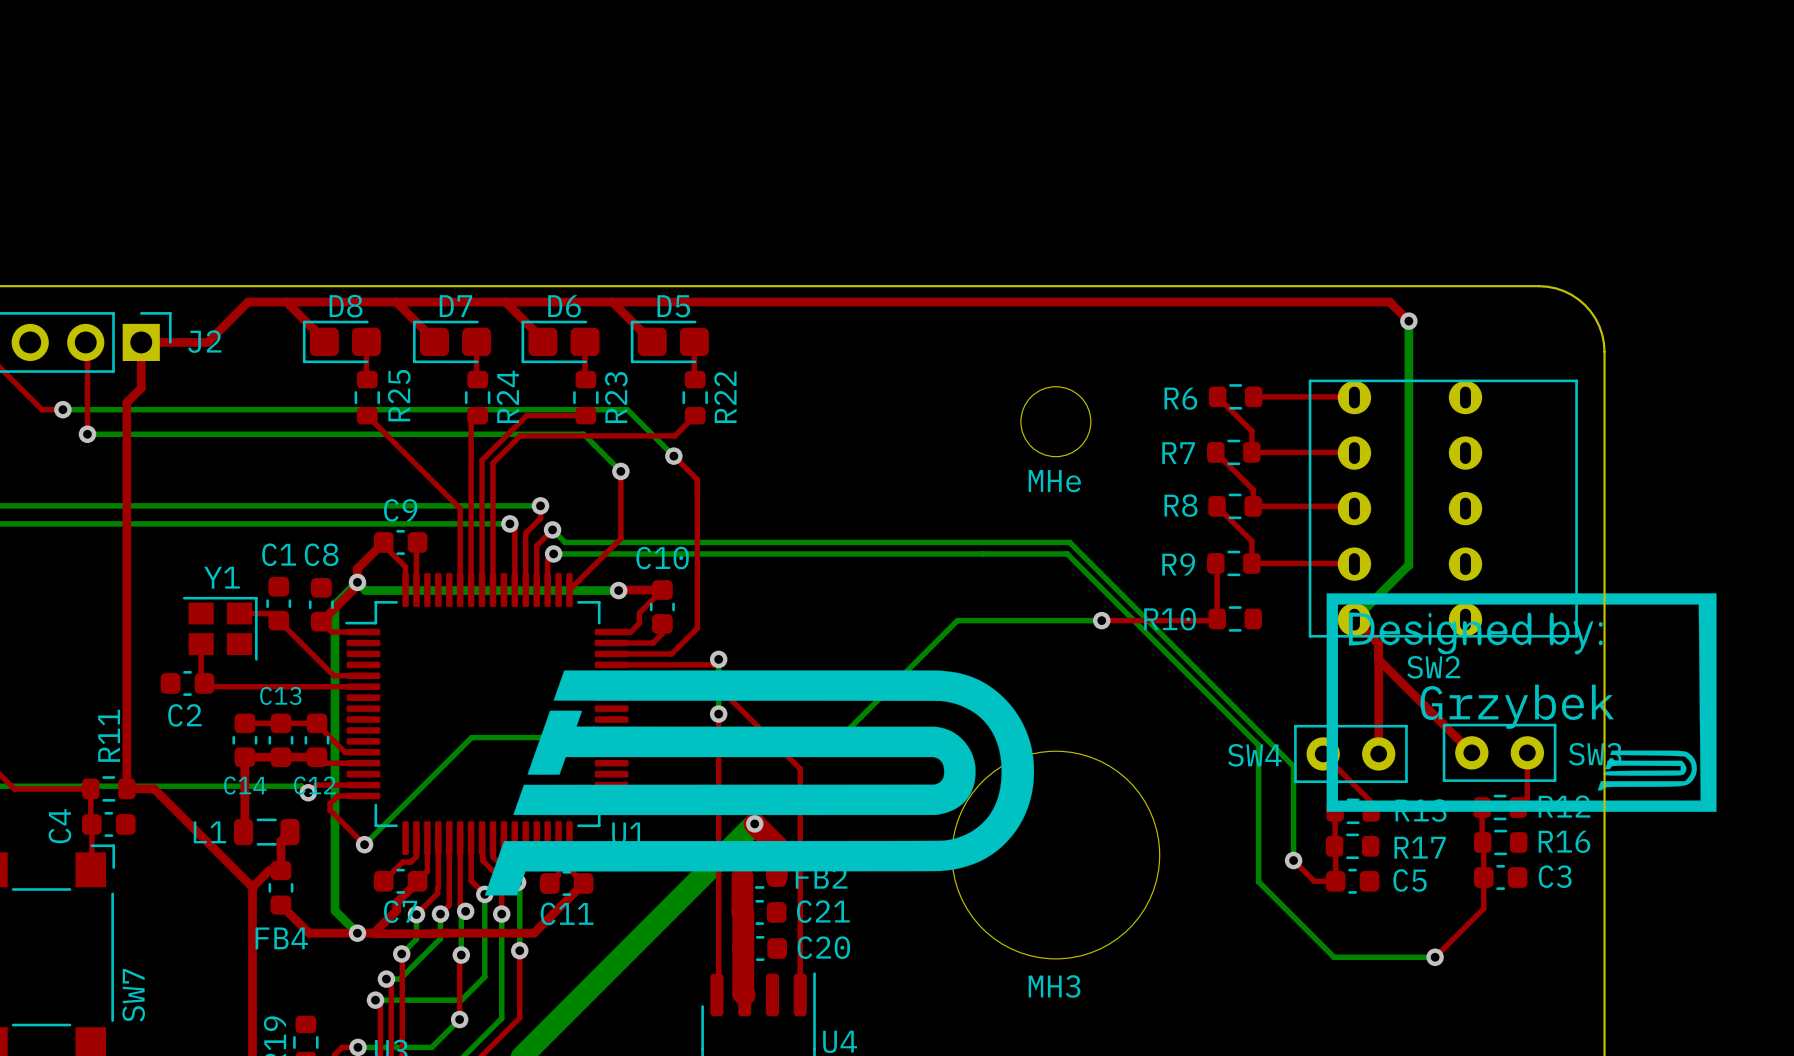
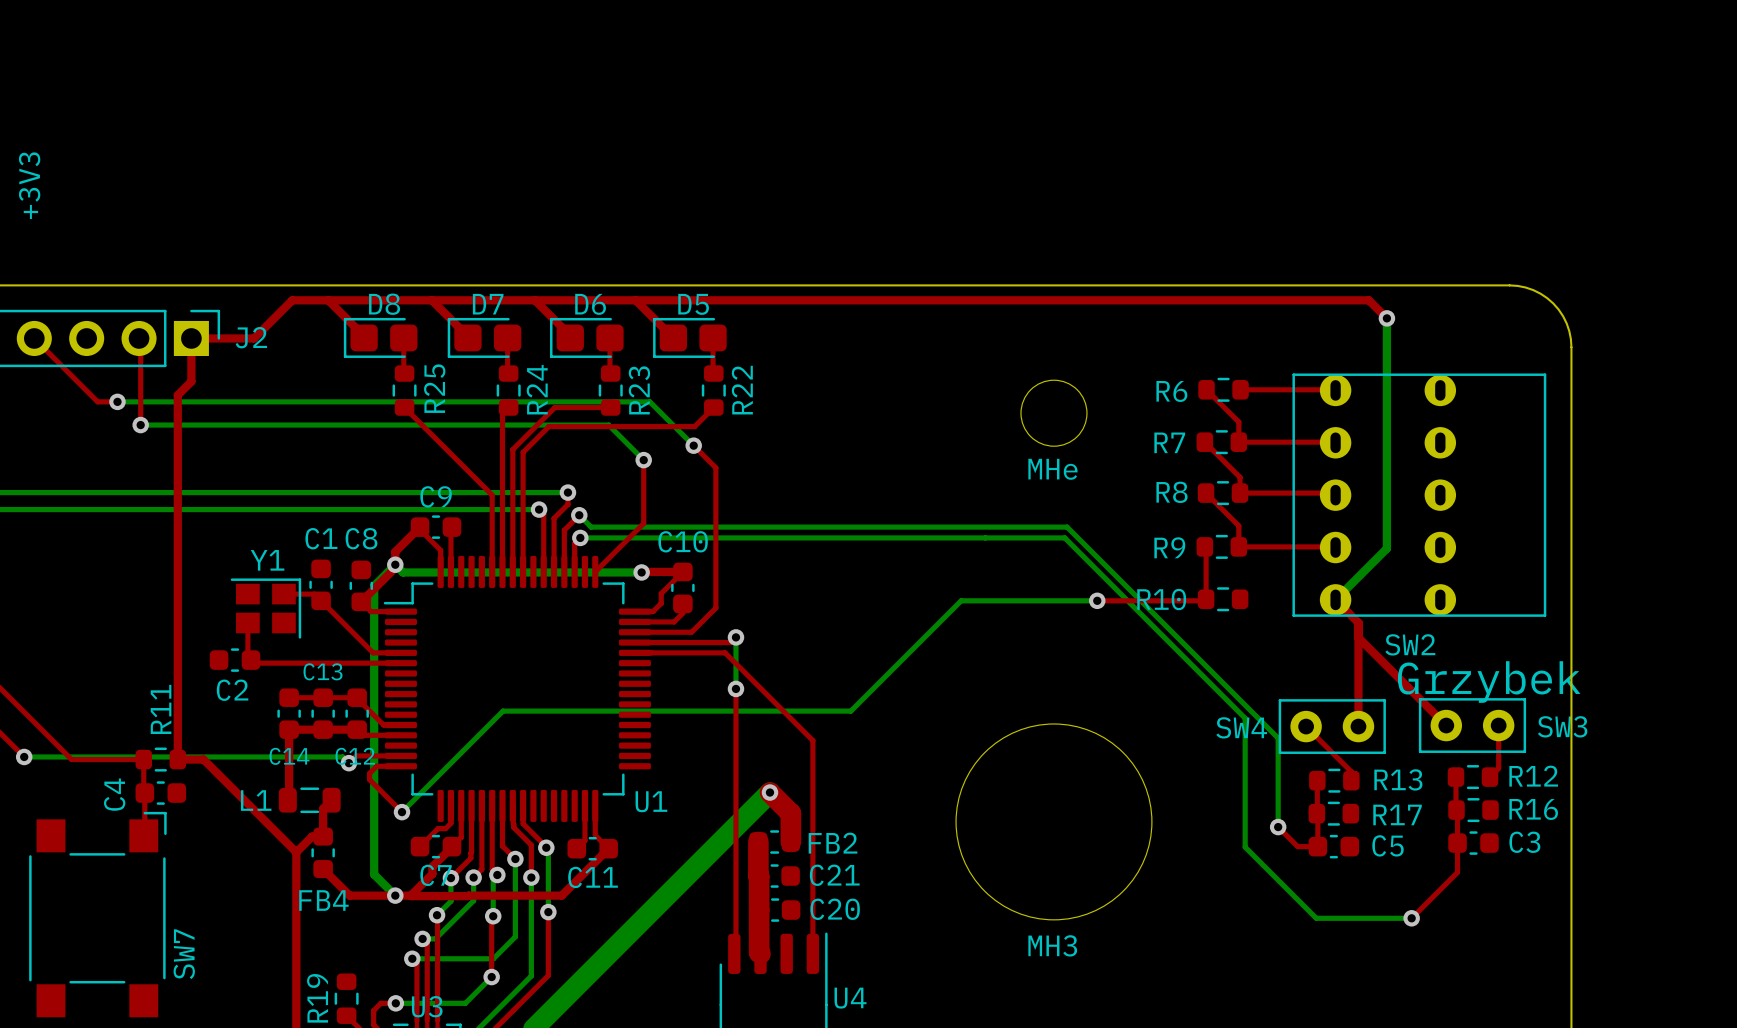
drawing: [1326, 593, 1717, 812] -> none
drawing: [484, 670, 1035, 896] -> none

